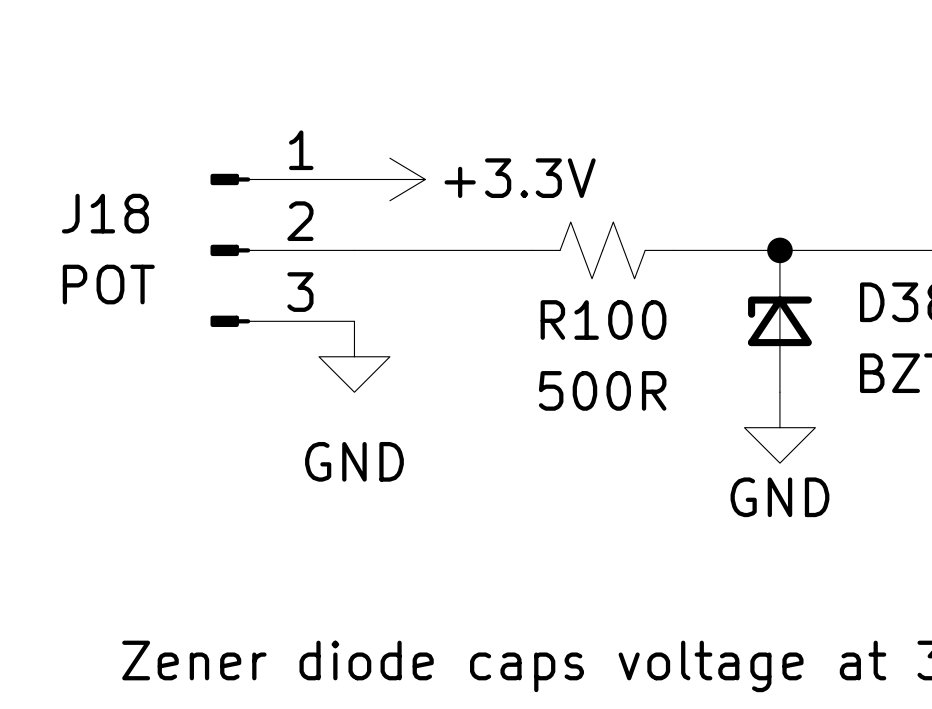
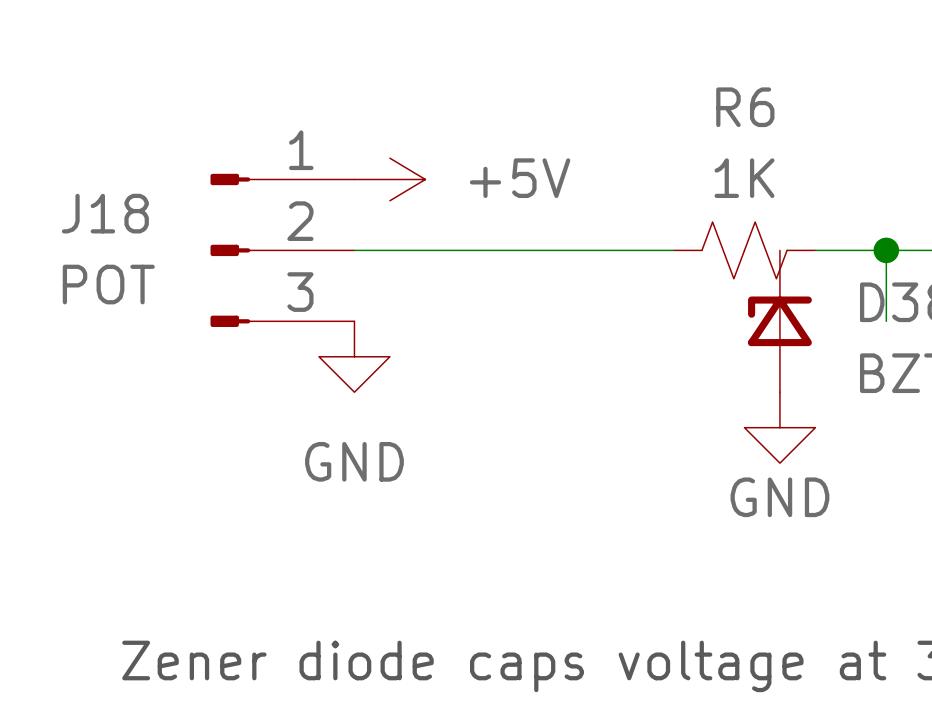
power symbol: +3.3V (389, 179) -> +5V (389, 179)
R100: 500R (602, 250) -> none
wire: (673, 250) (815, 250) -> (673, 250) (531, 250)
R6: none -> 1K (744, 250)
junction position: (779, 250) -> (886, 250)
wire: none -> (886, 250) (886, 321)

